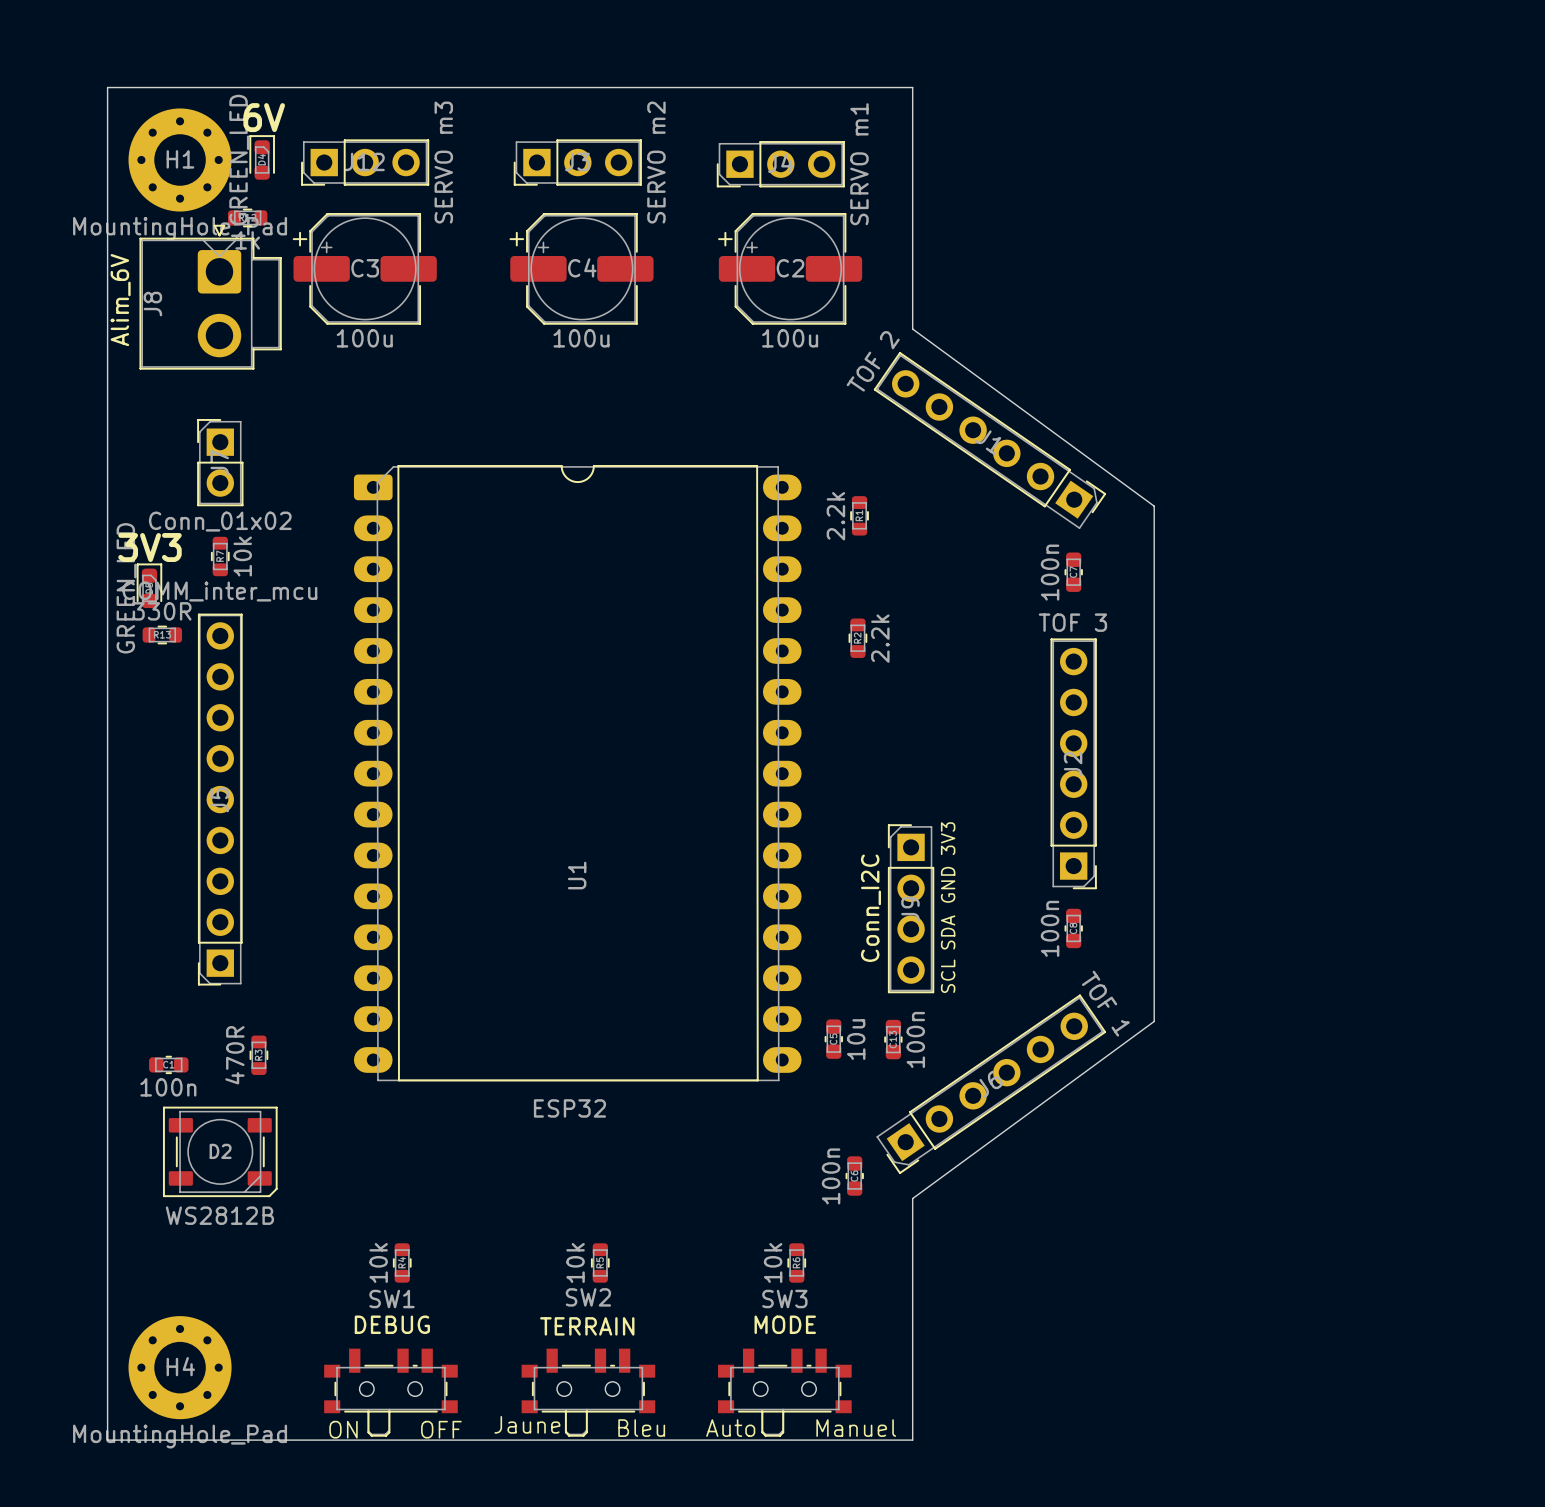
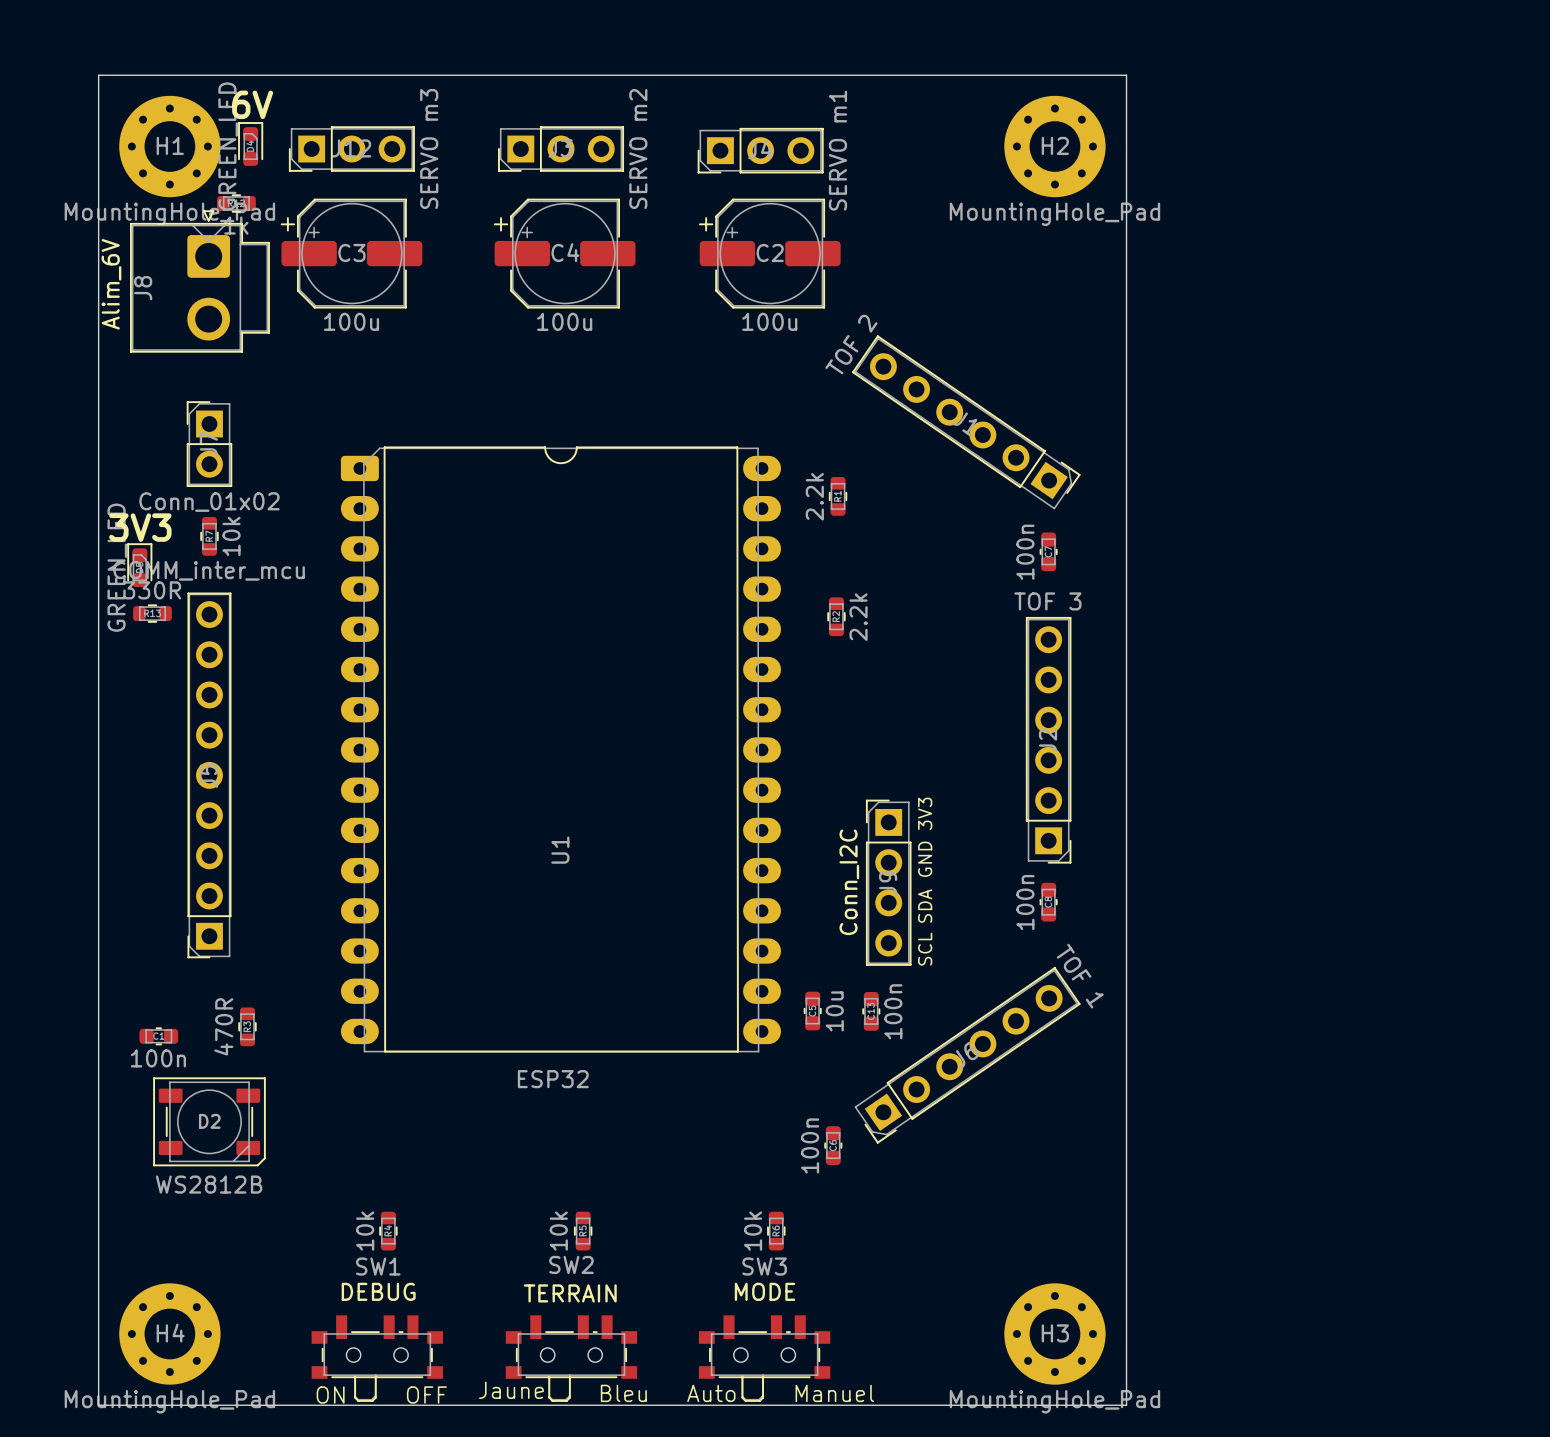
board edge: (912, 87) (912, 329) (1154, 506) (1154, 1021) (912, 1198) (912, 1440) -> (890, 75) (1126, 75) (1126, 1405) (890, 1405)
H2: none -> MountingHole_Pad (1054, 146)
H3: none -> MountingHole_Pad (1054, 1334)

